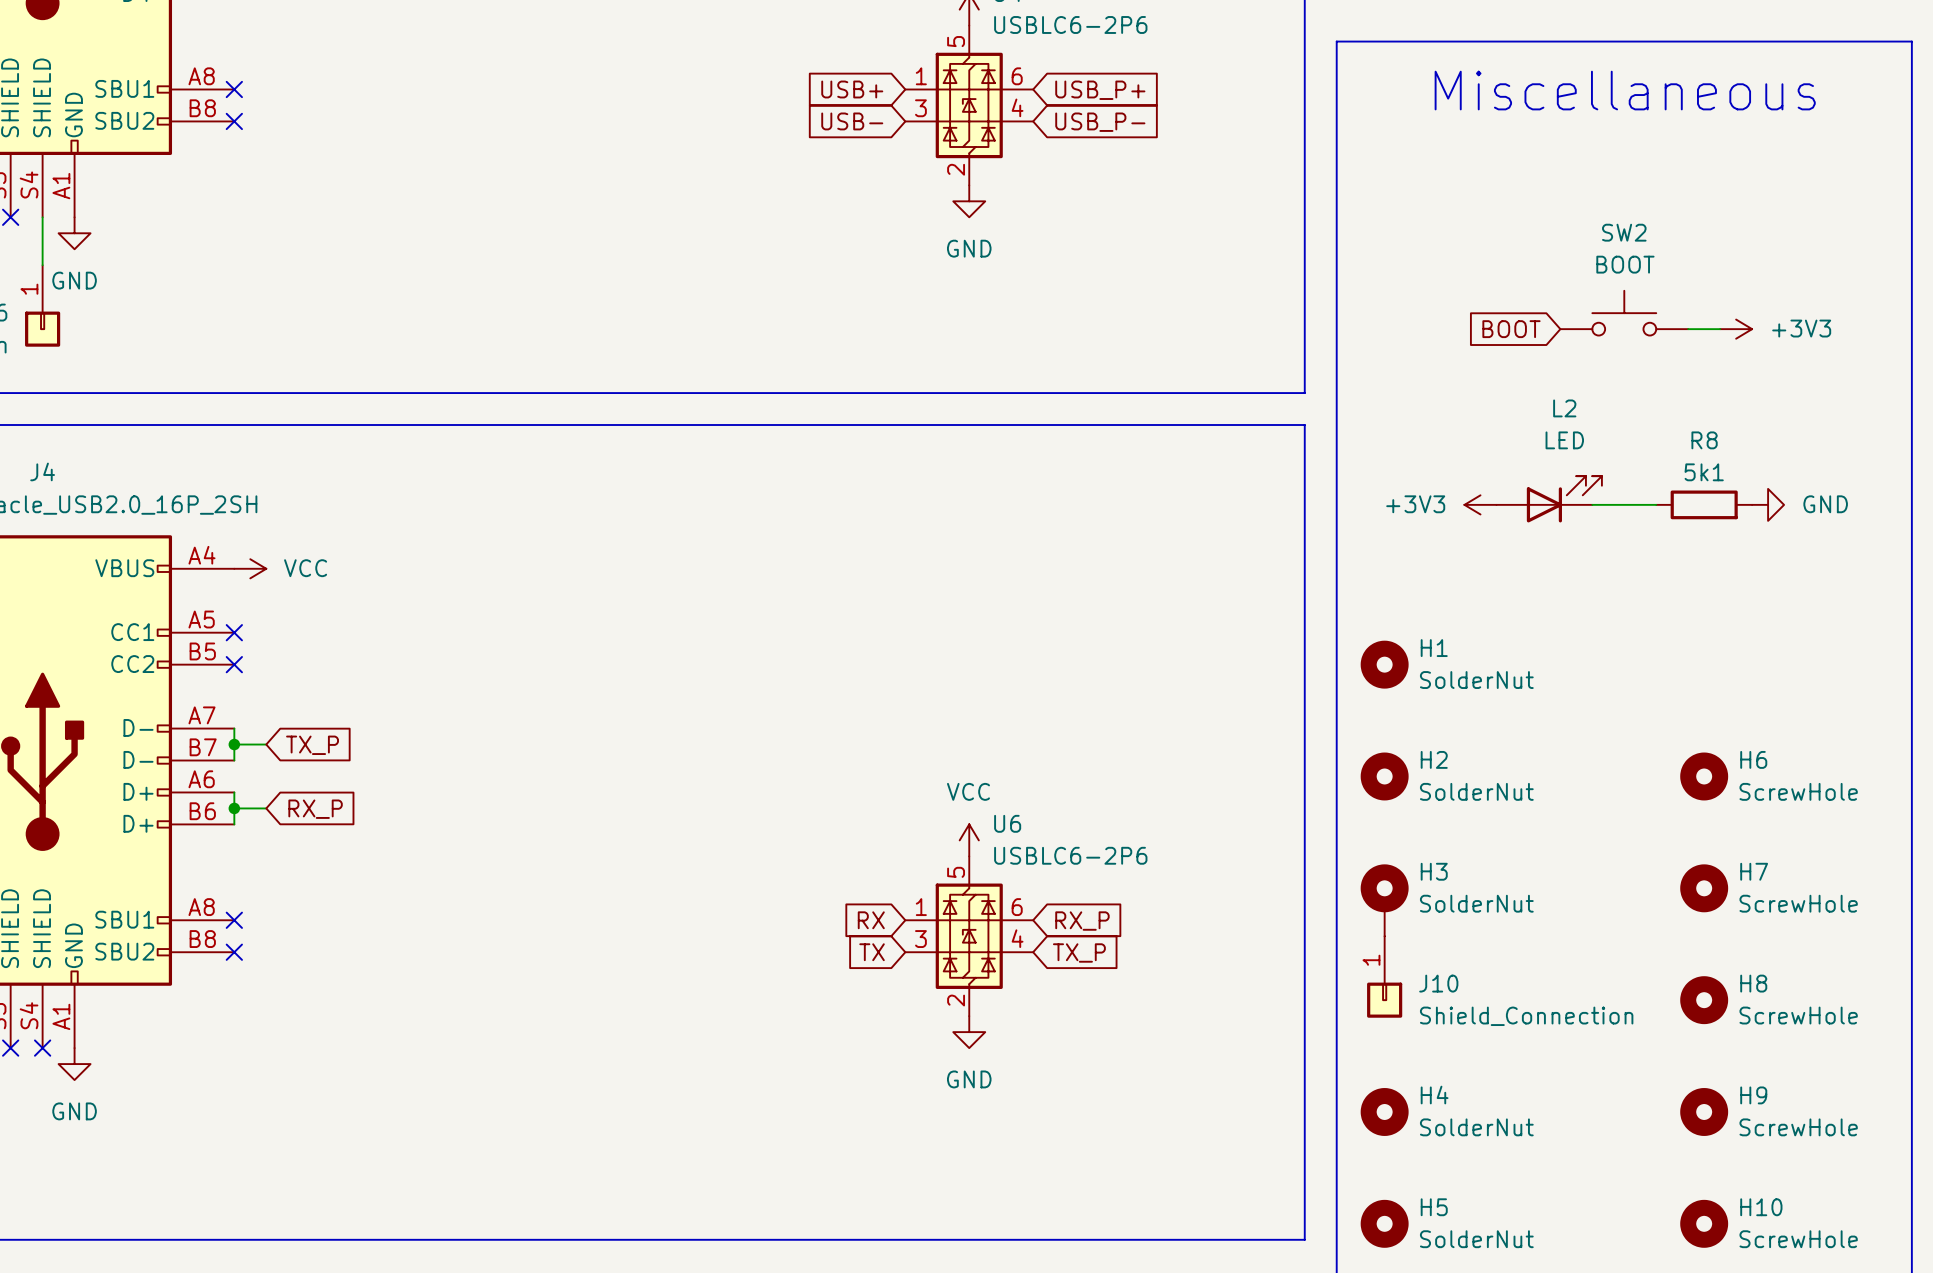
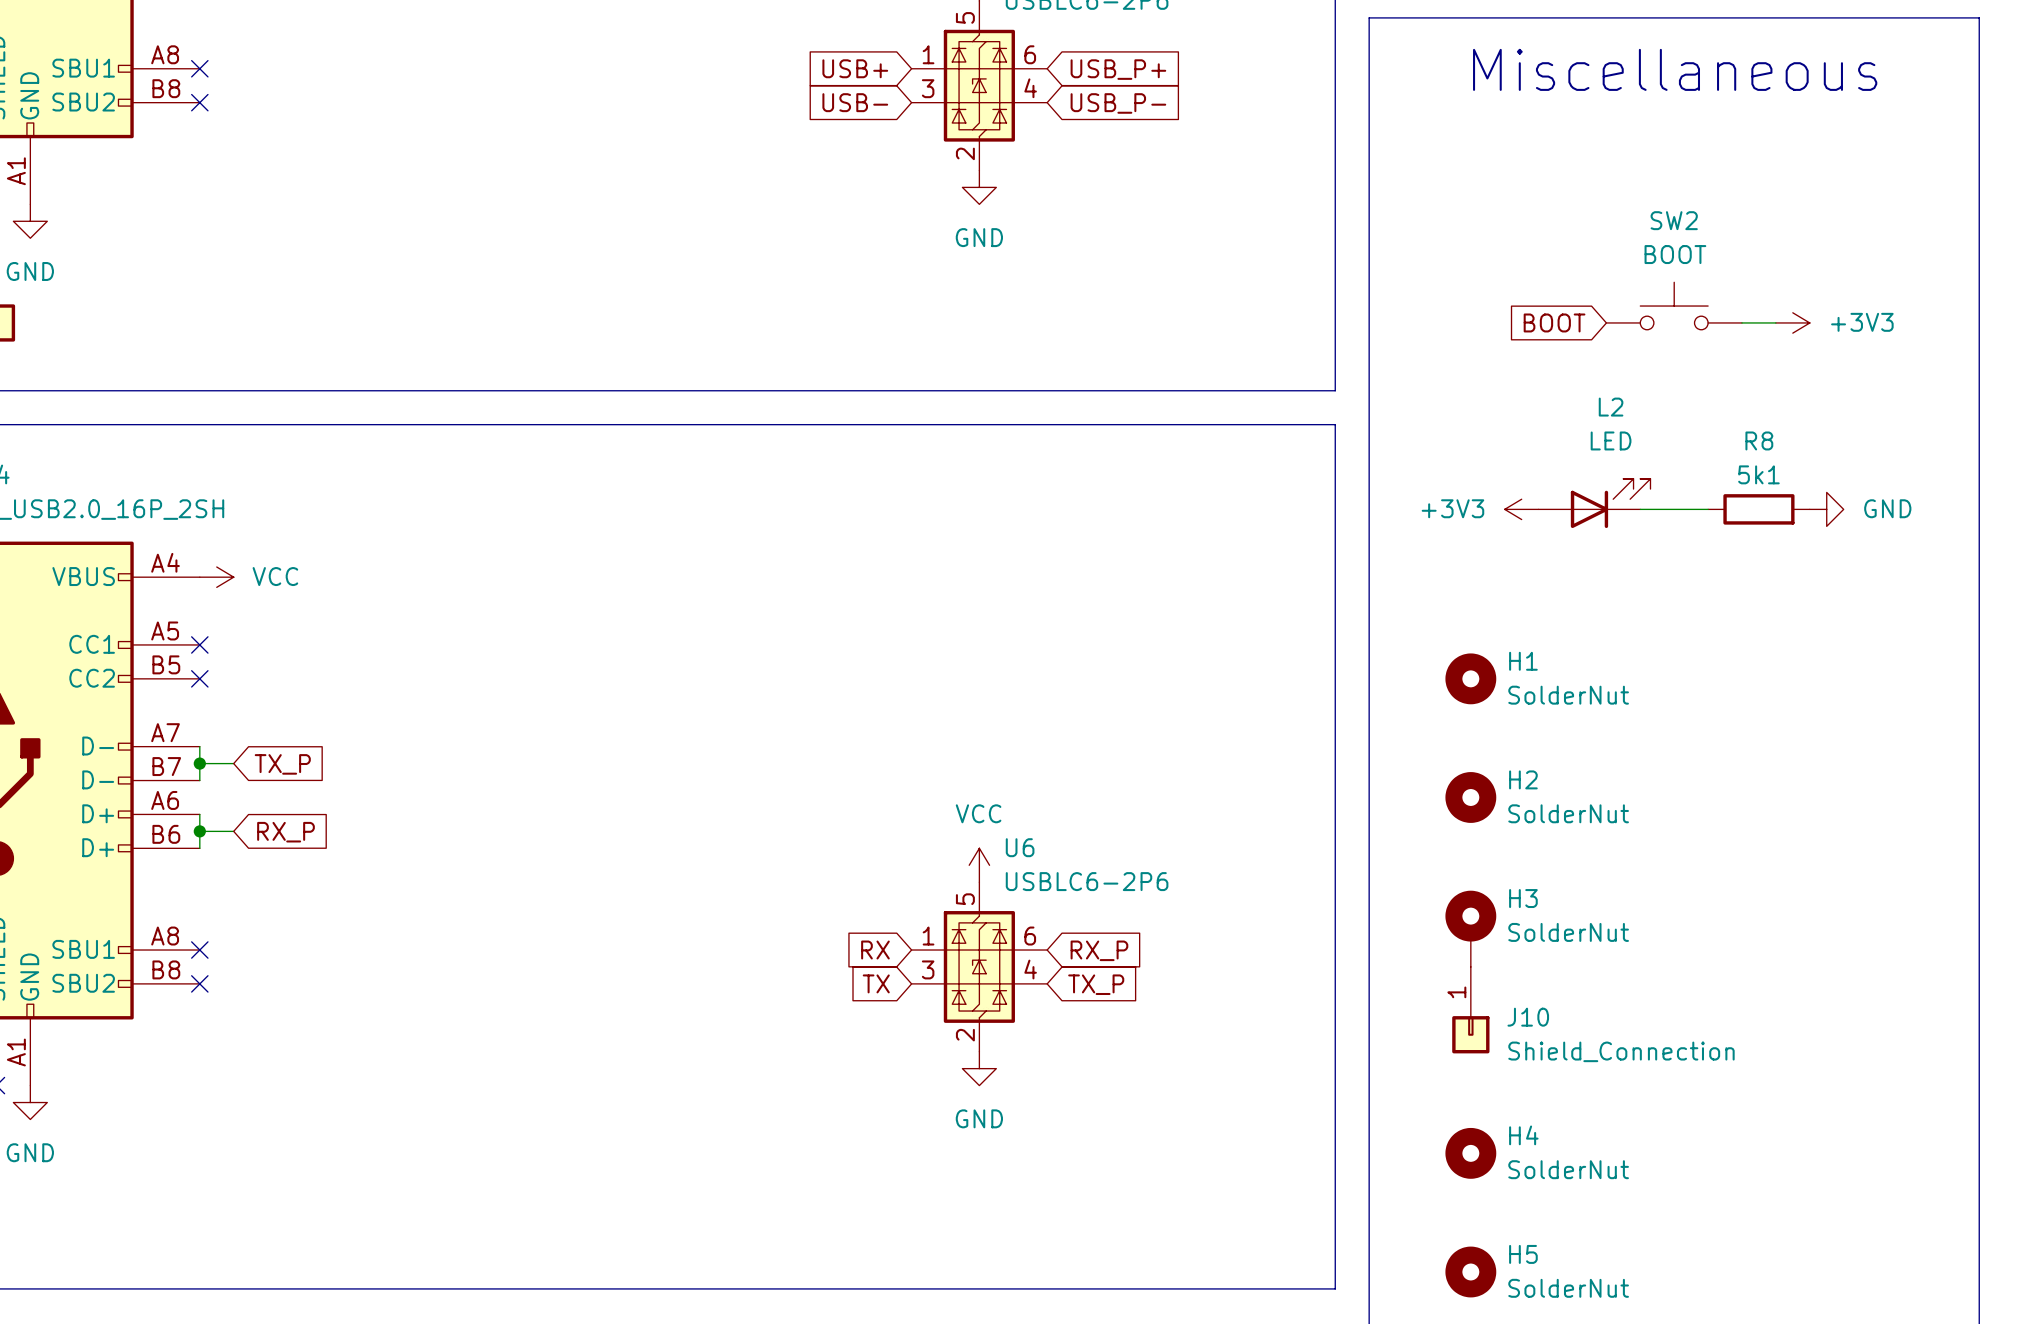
H1 position: (1384, 664) -> (1470, 678)
H2 position: (1384, 776) -> (1470, 797)
H6: ScrewHole (1704, 776) -> none
H7: ScrewHole (1704, 888) -> none
H3 position: (1384, 900) -> (1470, 928)
J10 position: (1384, 976) -> (1470, 1010)
H8: ScrewHole (1704, 1000) -> none
H4 position: (1384, 1111) -> (1470, 1153)
H9: ScrewHole (1704, 1111) -> none
H5 position: (1384, 1223) -> (1470, 1272)
H10: ScrewHole (1704, 1223) -> none

